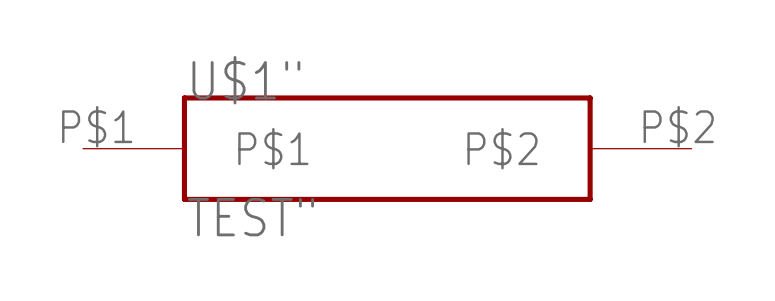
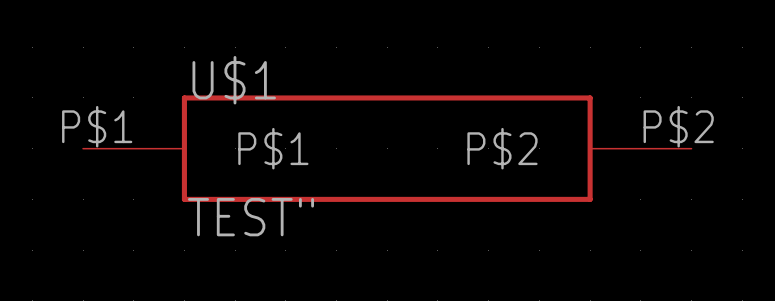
U$1" name: U$1" (246, 80) -> U$1 (234, 80)

